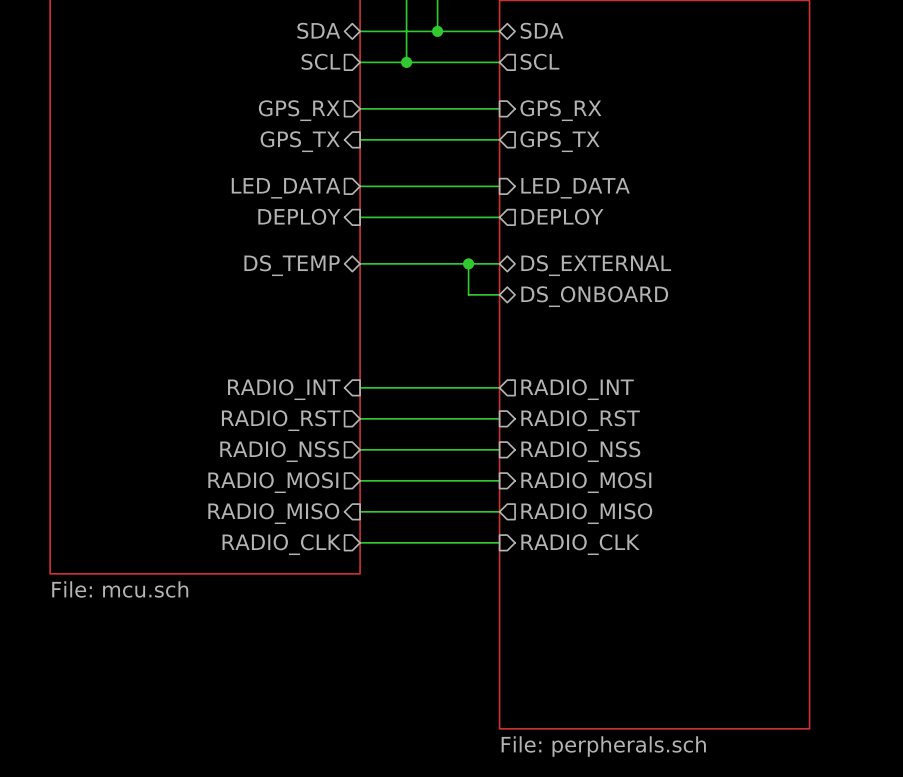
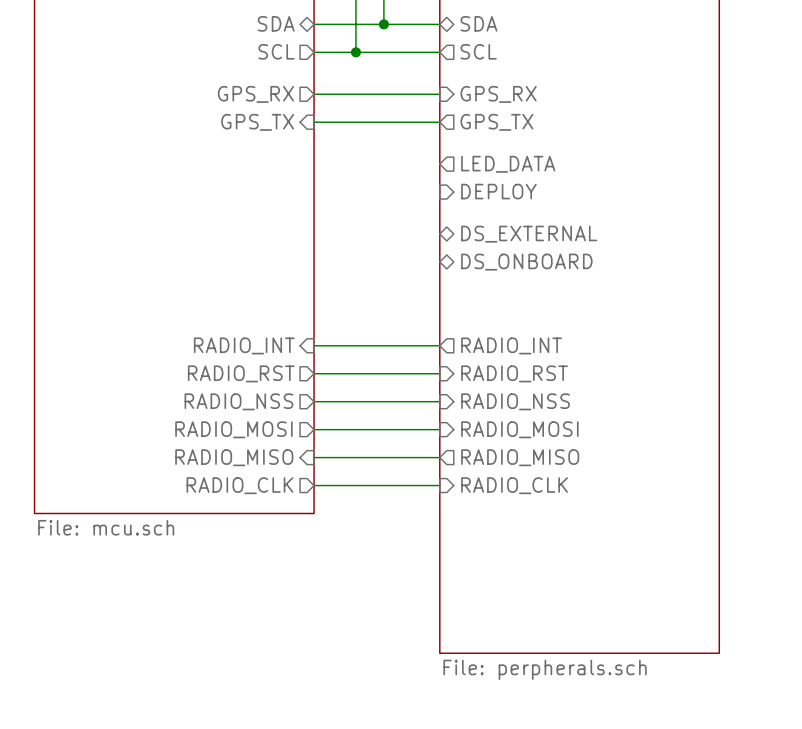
wire: (360, 186) (499, 186) -> none
sheet pin: LED_DATA (286, 188) -> none
sheet pin shape: input (575, 188) -> output (508, 164)
sheet pin: DEPLOY (299, 216) -> none
sheet pin shape: output (562, 216) -> input (498, 191)
wire: (360, 217) (499, 217) -> none
wire: (360, 263) (499, 263) -> none
wire: (468, 263) (468, 294) (499, 294) -> none
junction: (468, 263) -> none
sheet pin: DS_TEMP (292, 265) -> none

